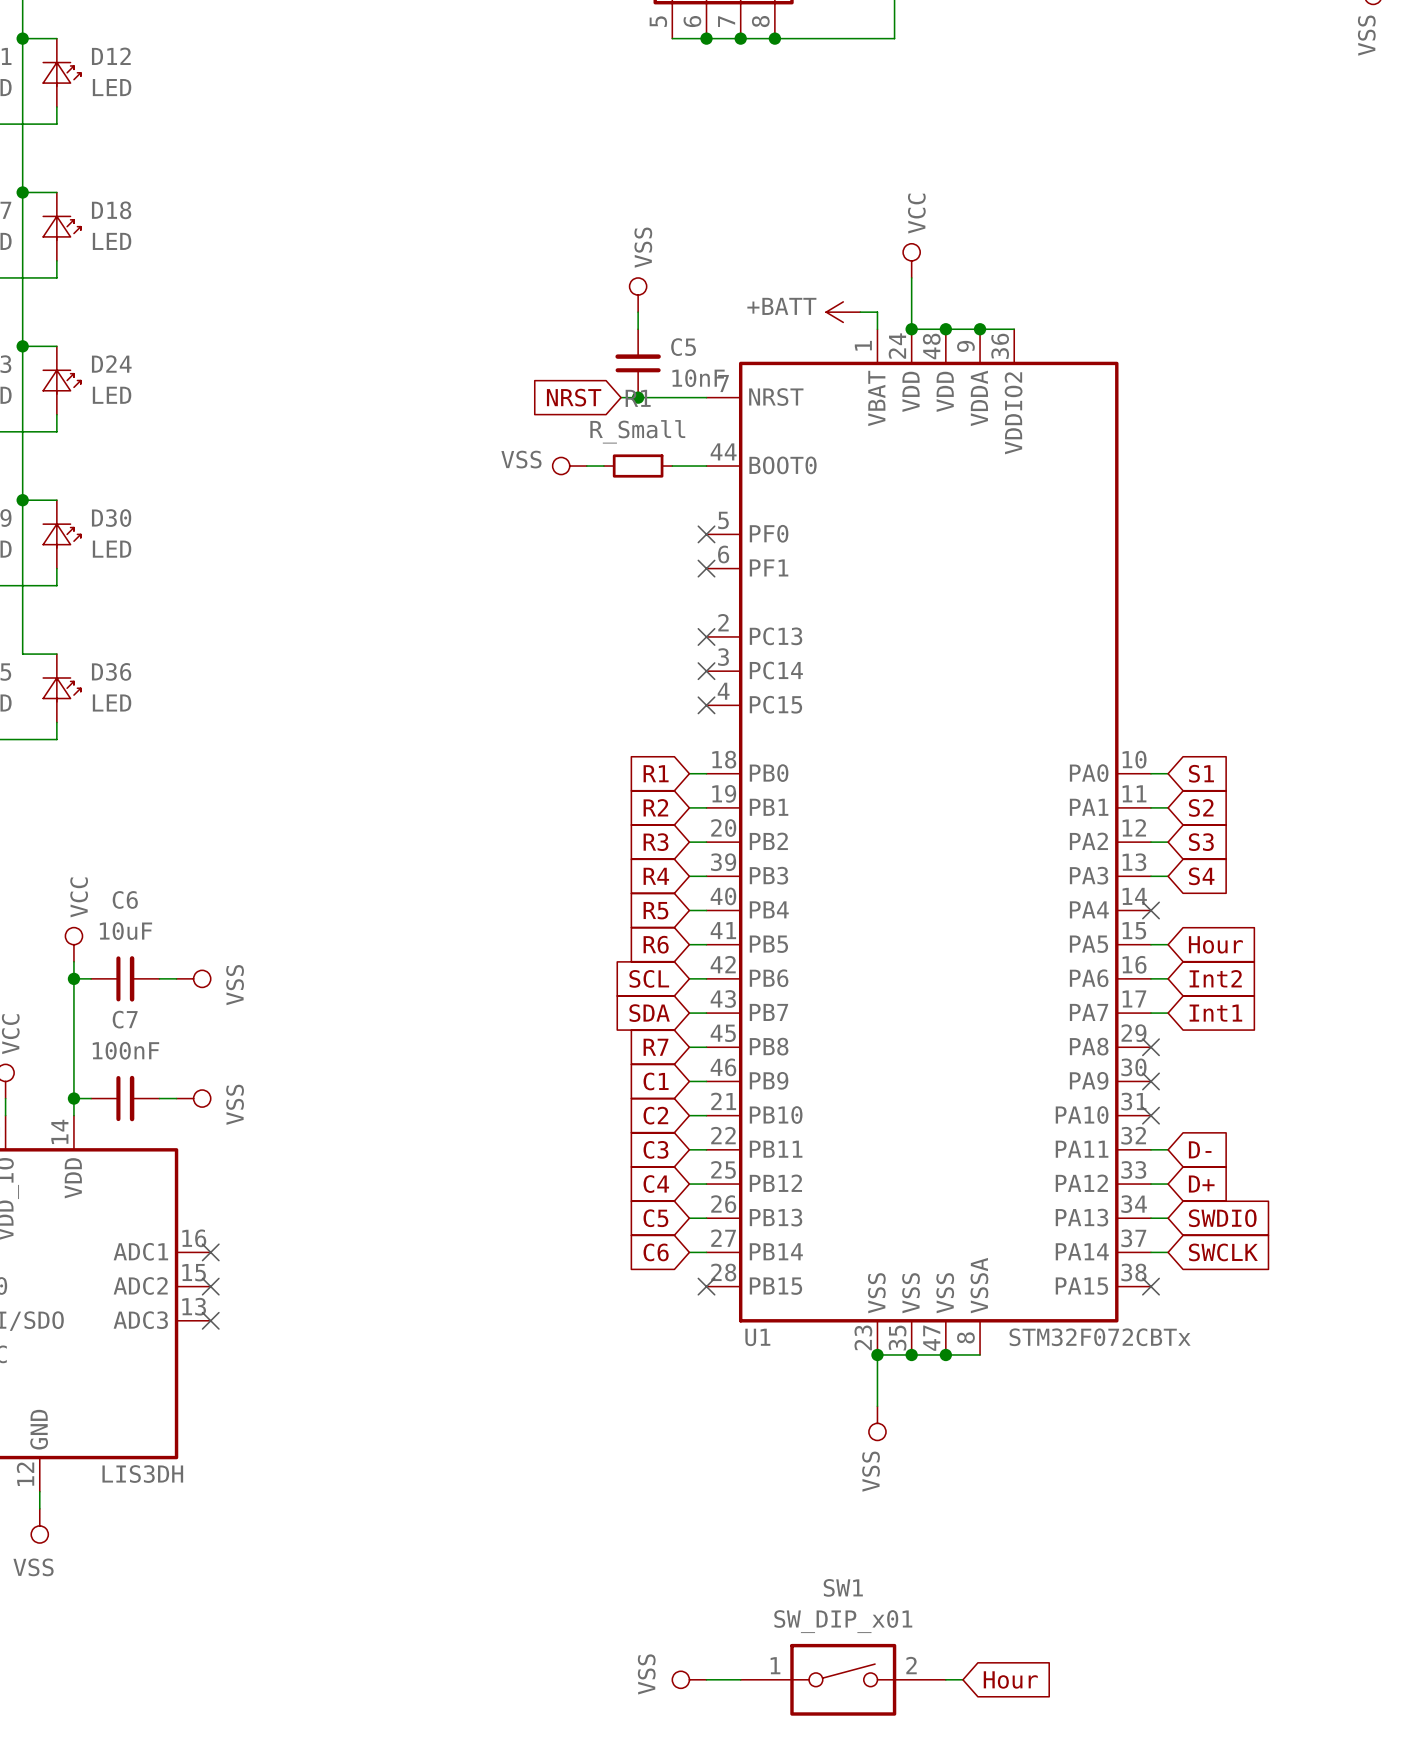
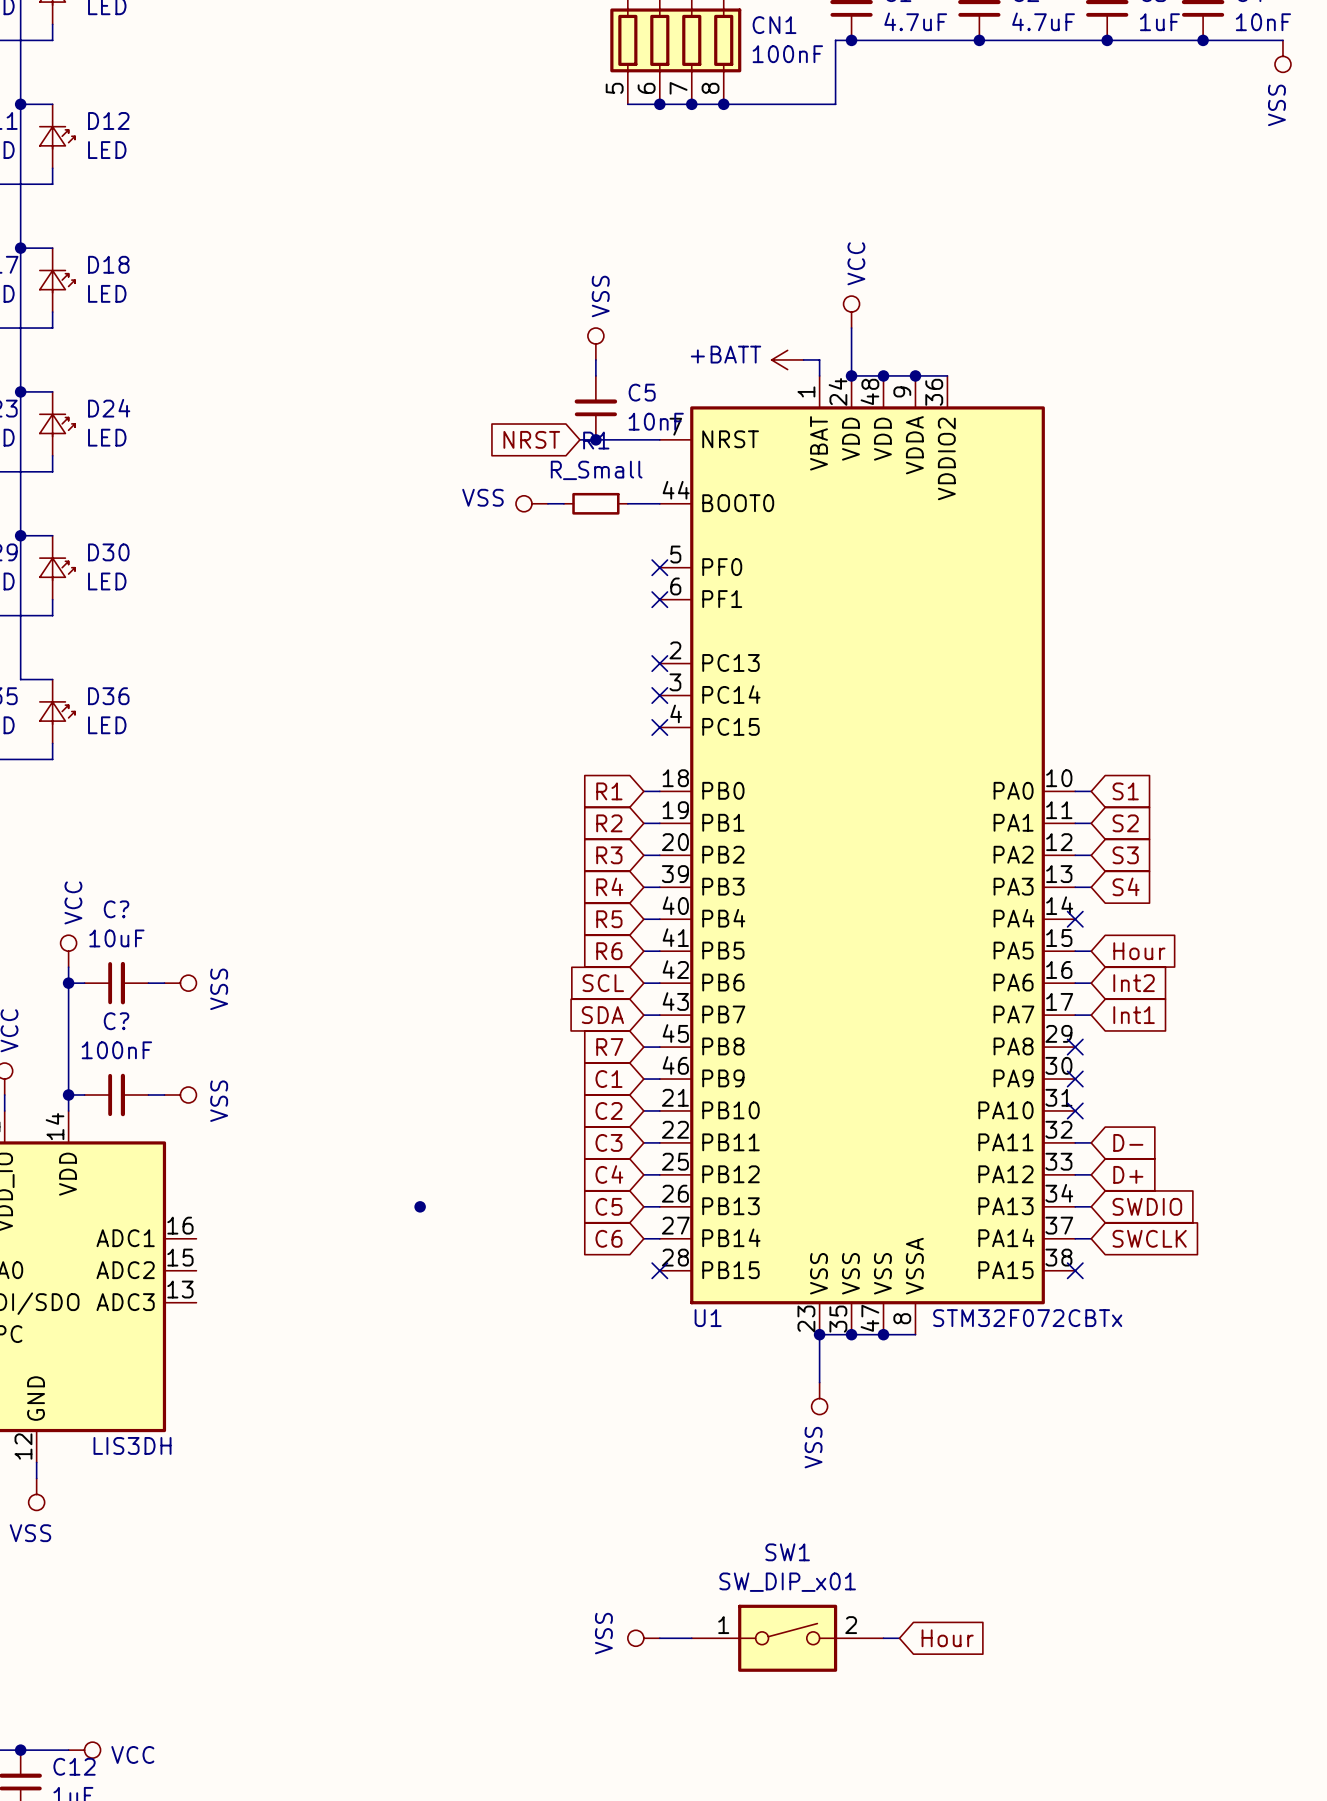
C6 name: C6 (125, 899) -> C? (116, 909)
C7 name: C7 (125, 1019) -> C? (116, 1021)
junction: none -> (420, 1206)
no-connect mark: (210, 1252) -> none
no-connect mark: (210, 1286) -> none
no-connect mark: (210, 1320) -> none

